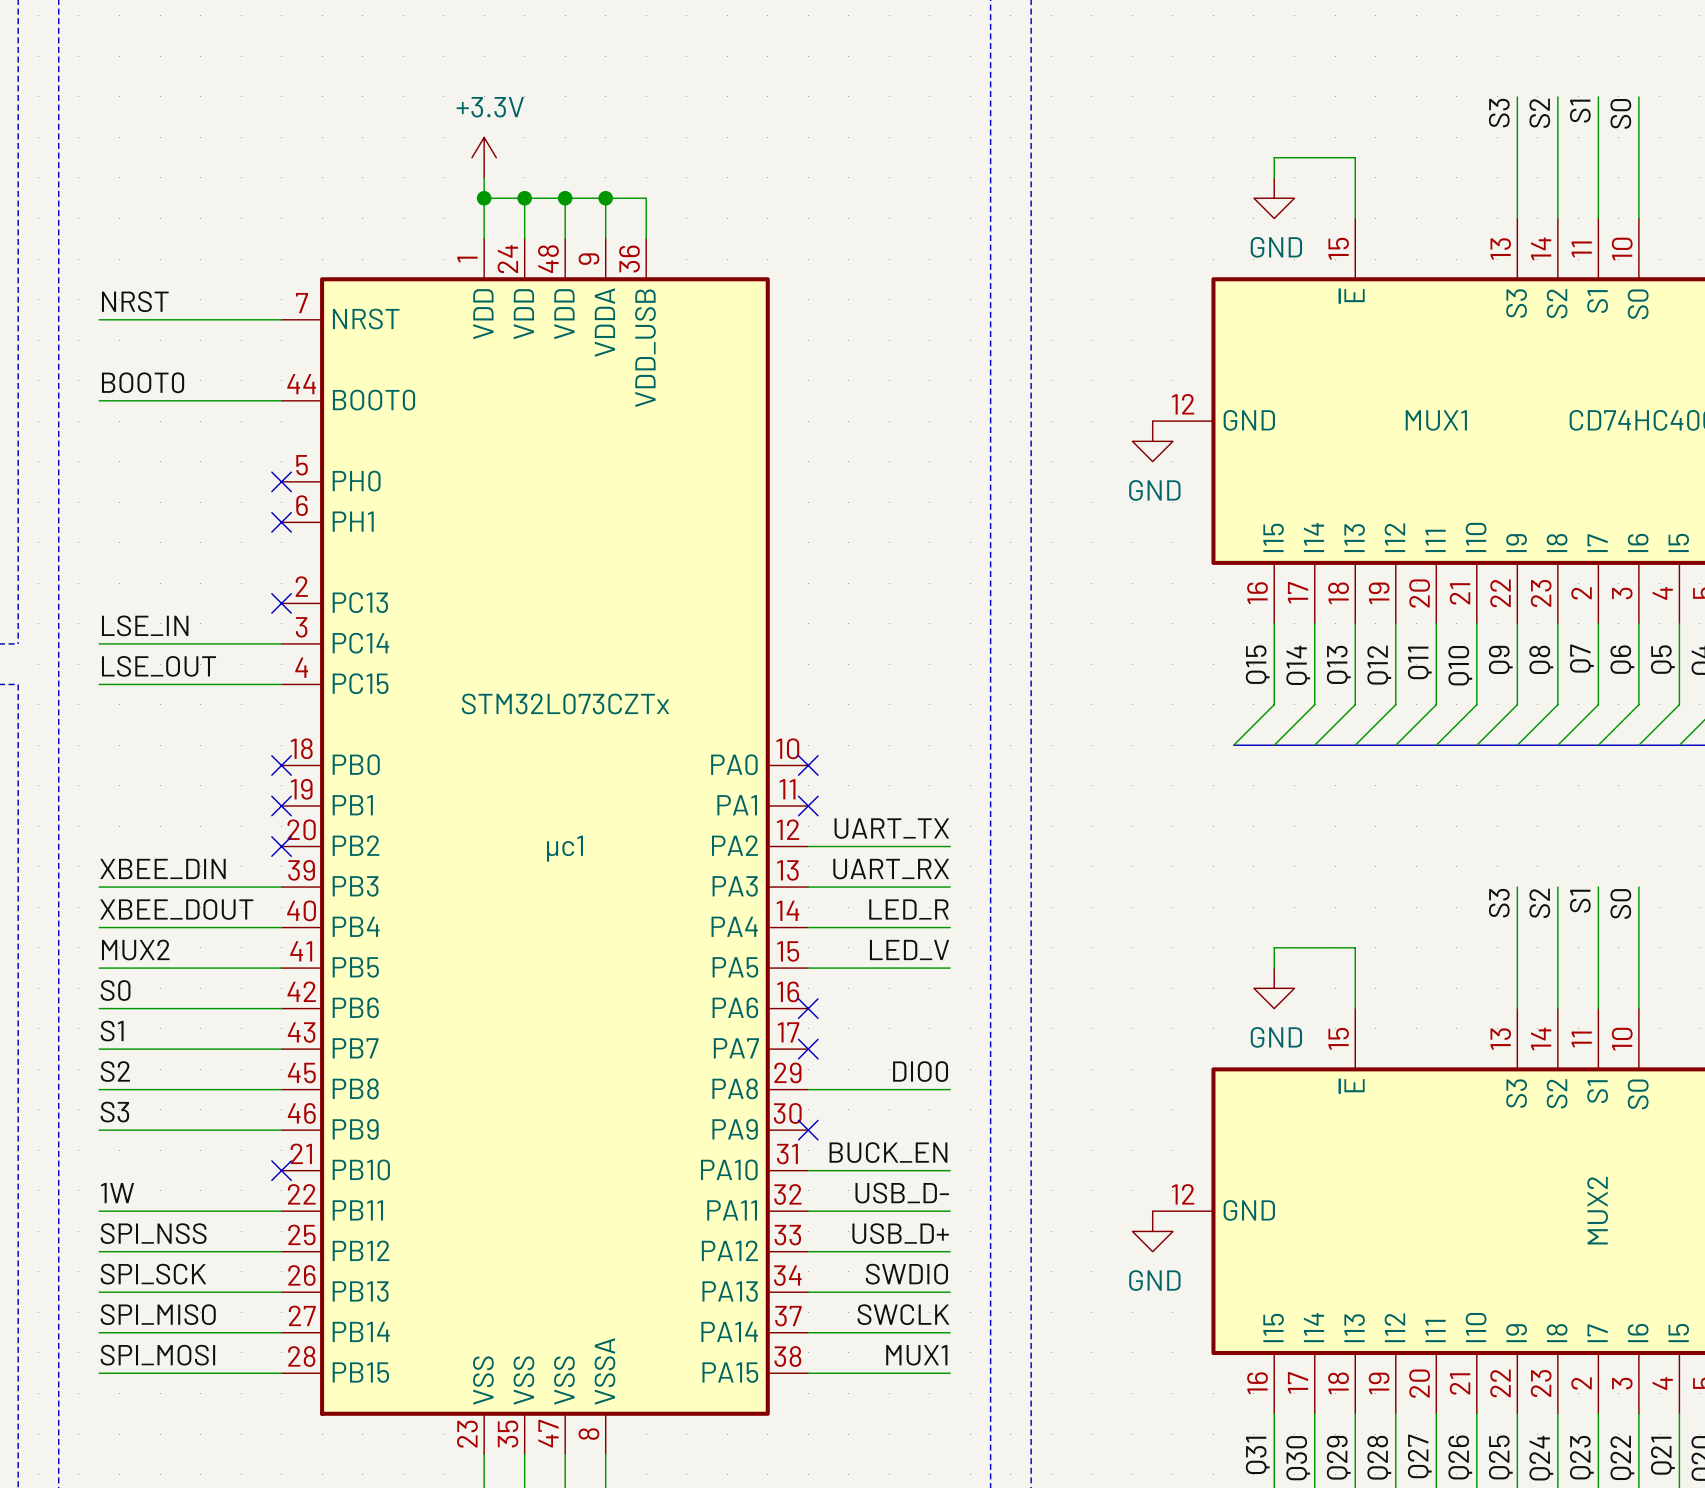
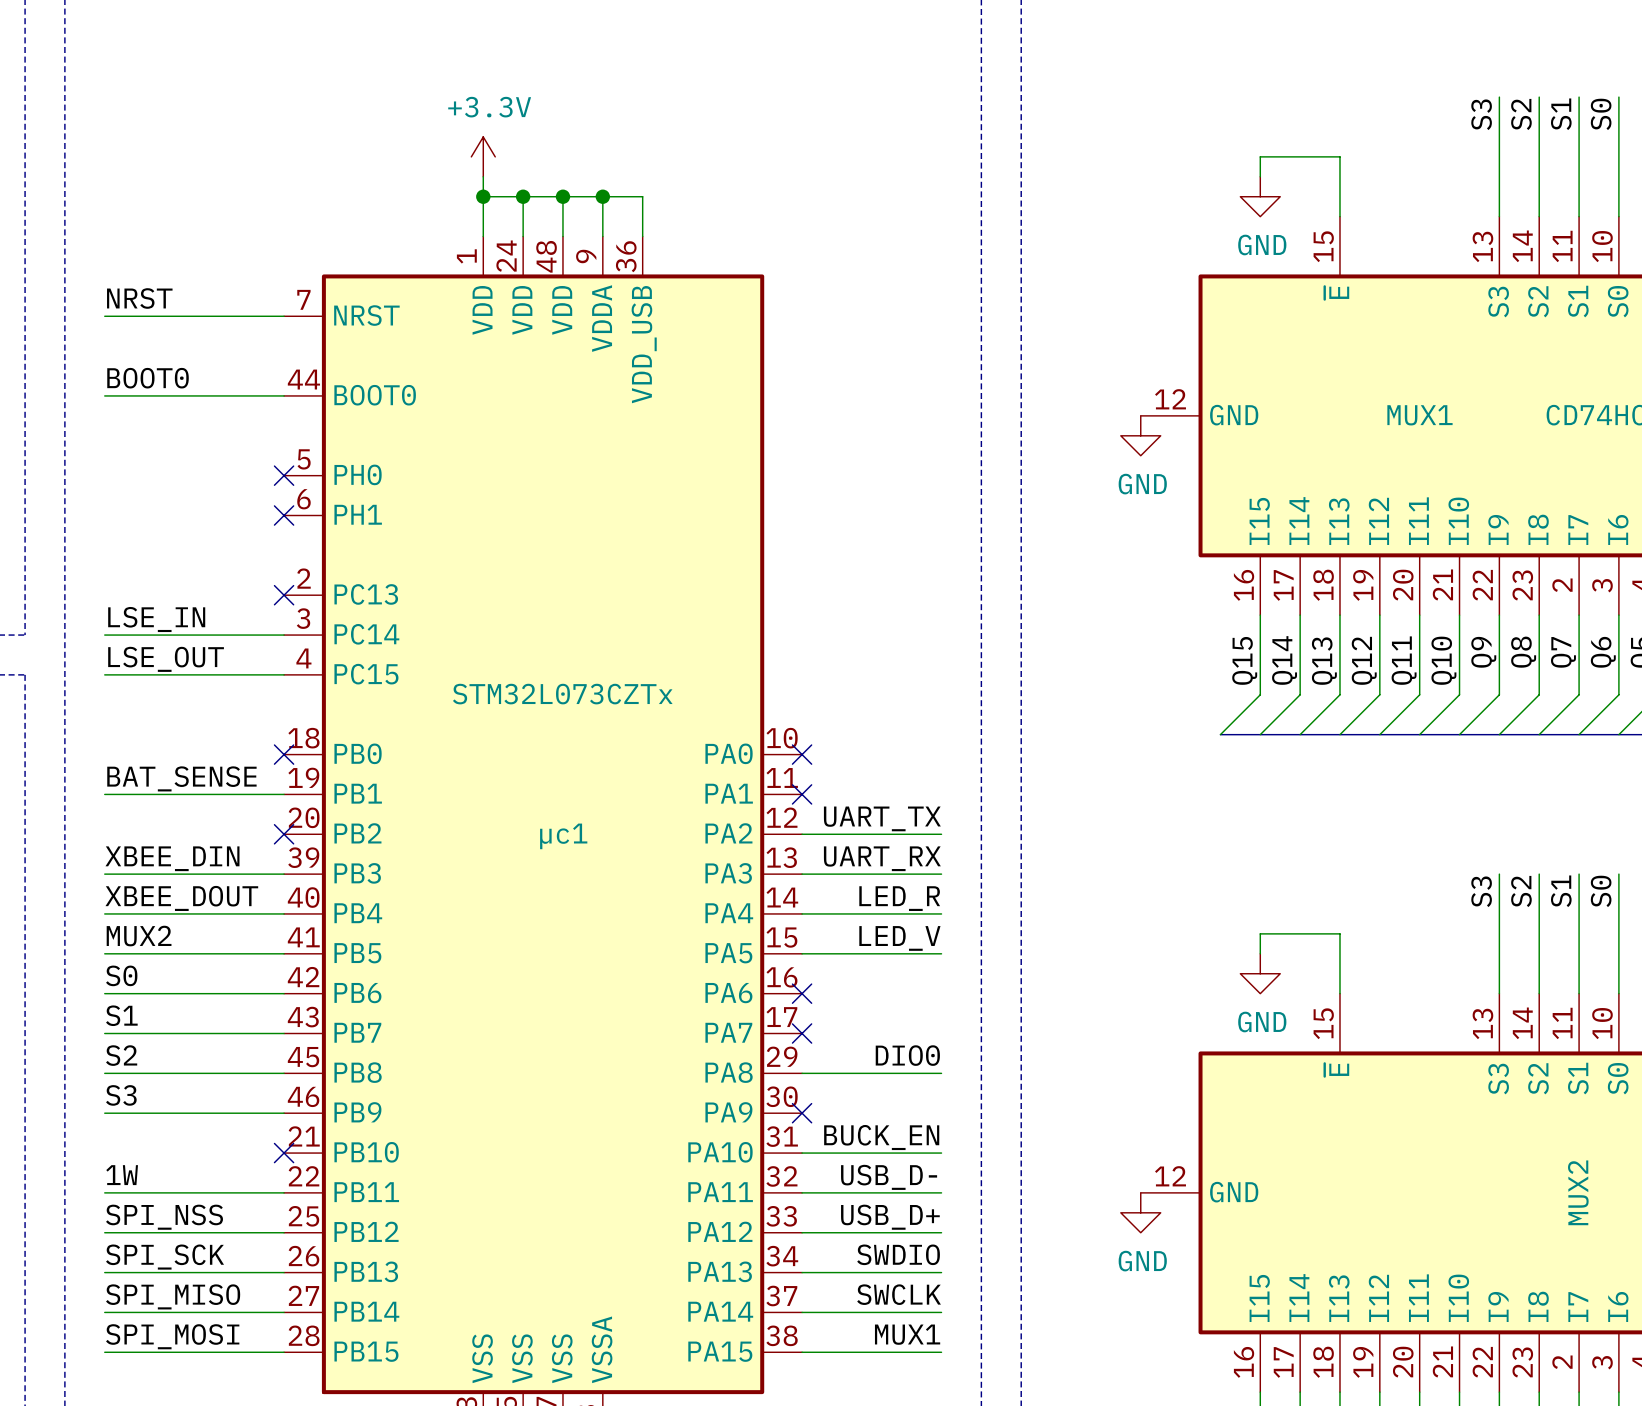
label: none -> BAT_SENSE (181, 778)
wire: none -> (104, 794) (284, 794)
no-connect mark: (281, 806) -> none

